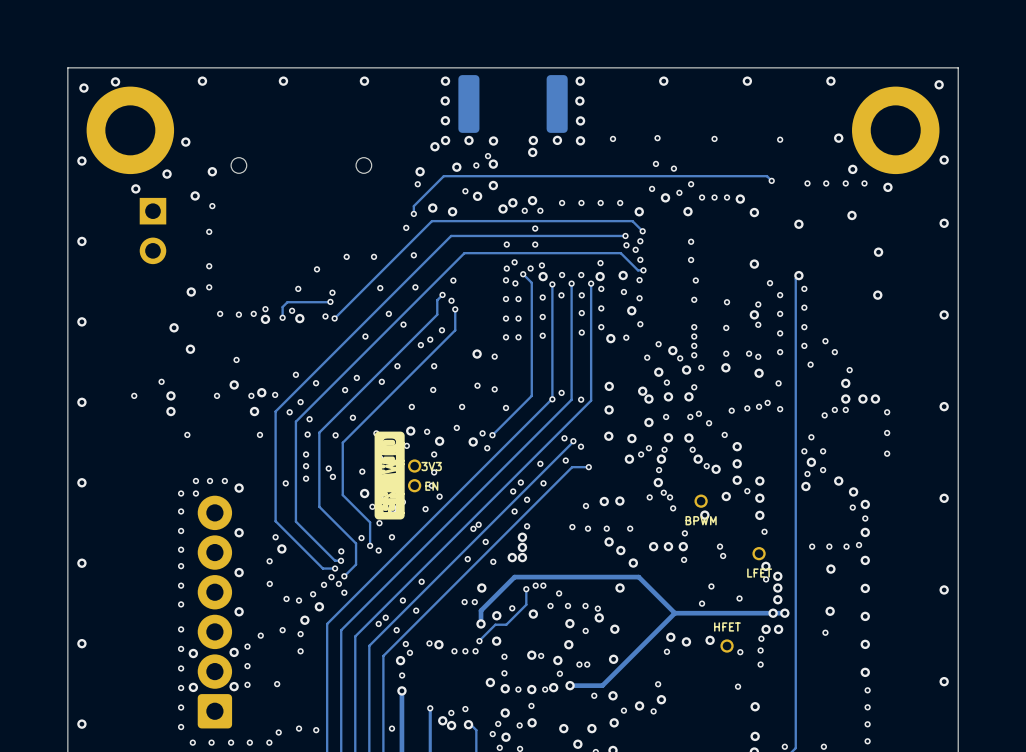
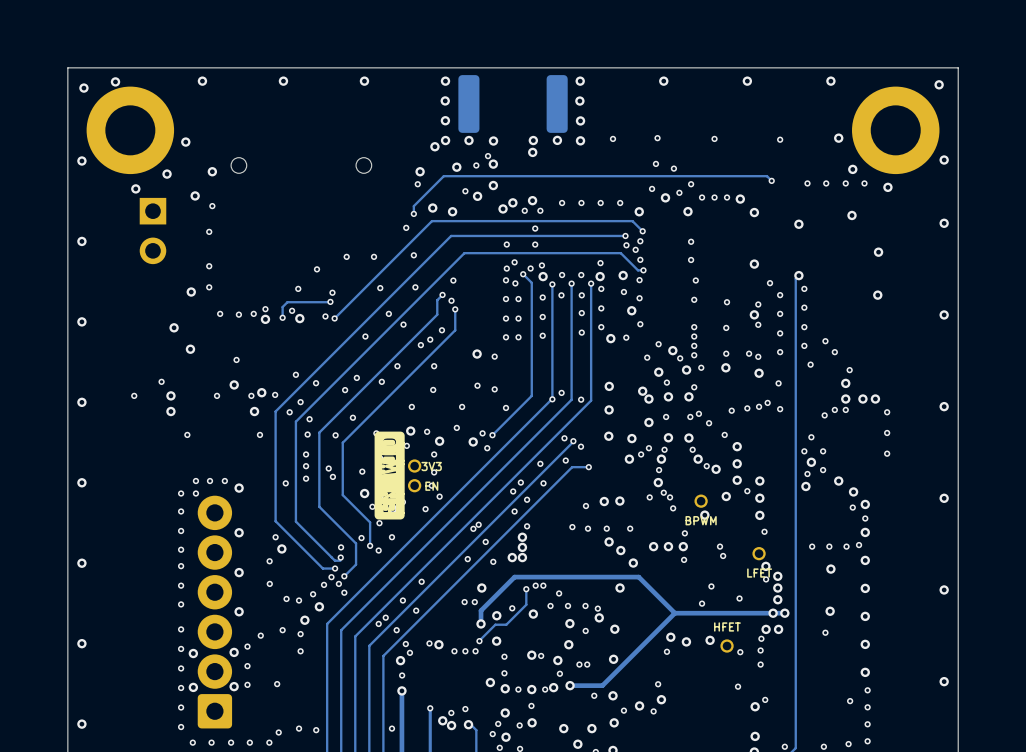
via: none -> (341, 547)
via: (341, 551) -> none
via: none -> (340, 557)
via: (341, 560) -> none
via: none -> (765, 699)
via: none -> (850, 701)
via: none -> (848, 744)

